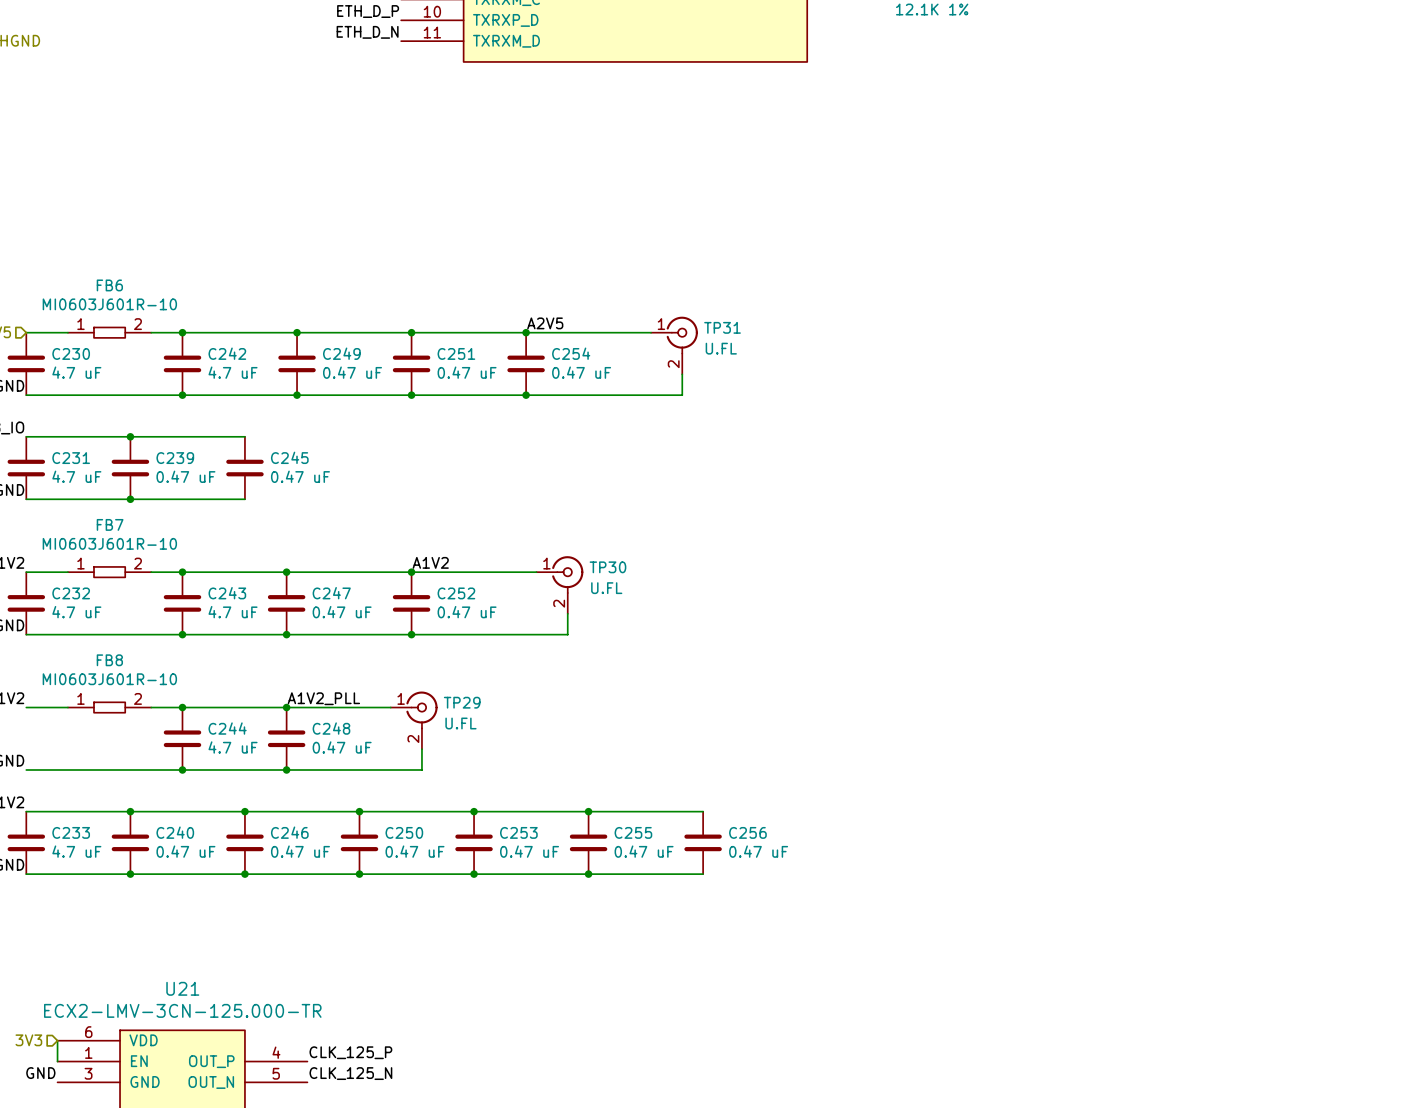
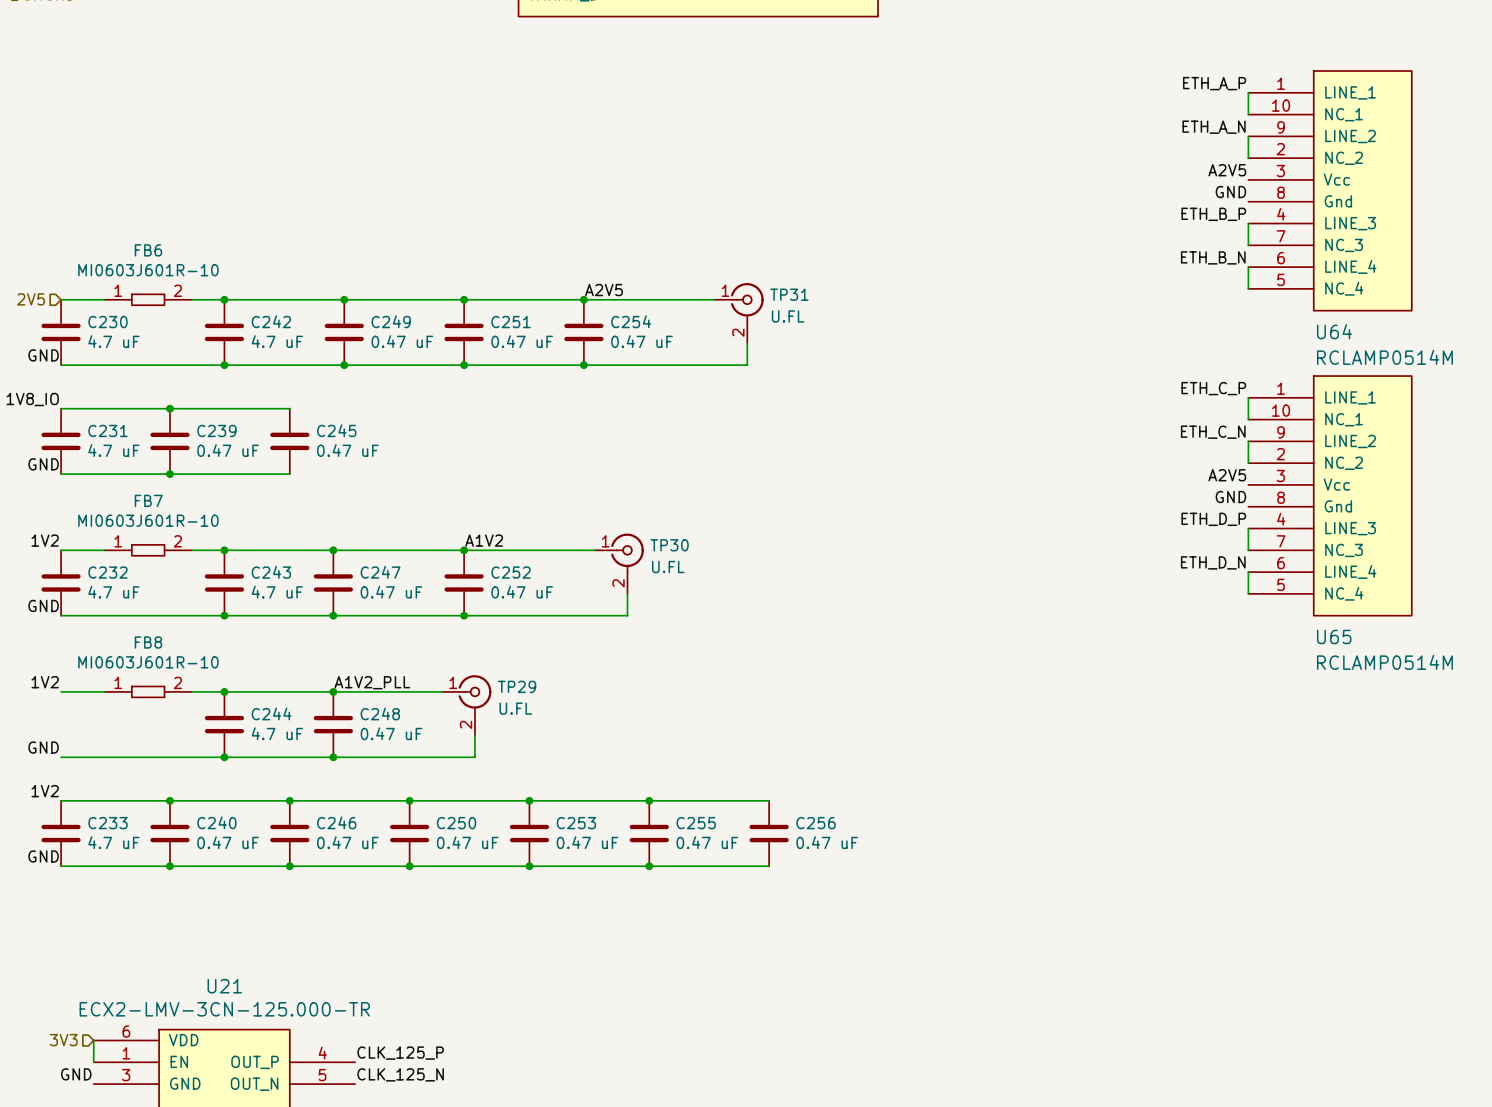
label: none -> ETH_A_P (1214, 83)
wire: none -> (1248, 92) (1248, 114)
label: none -> ETH_A_N (1214, 127)
wire: none -> (1248, 136) (1248, 158)
label: none -> A2V5 (1227, 170)
U64: none -> RCLAMP0514M (1330, 190)
label: none -> GND (1230, 192)
label: none -> ETH_B_P (1213, 214)
wire: none -> (1248, 223) (1248, 245)
label: none -> ETH_B_N (1213, 257)
wire: none -> (1248, 267) (1248, 288)
label: none -> ETH_C_P (1213, 388)
wire: none -> (1248, 397) (1248, 419)
label: none -> ETH_C_N (1213, 432)
wire: none -> (1248, 441) (1248, 463)
label: none -> A2V5 (1227, 475)
U65: none -> RCLAMP0514M (1330, 495)
label: none -> GND (1230, 497)
label: none -> ETH_D_P (1213, 519)
wire: none -> (1248, 528) (1248, 550)
label: none -> ETH_D_N (1213, 562)
wire: none -> (1248, 572) (1248, 593)

